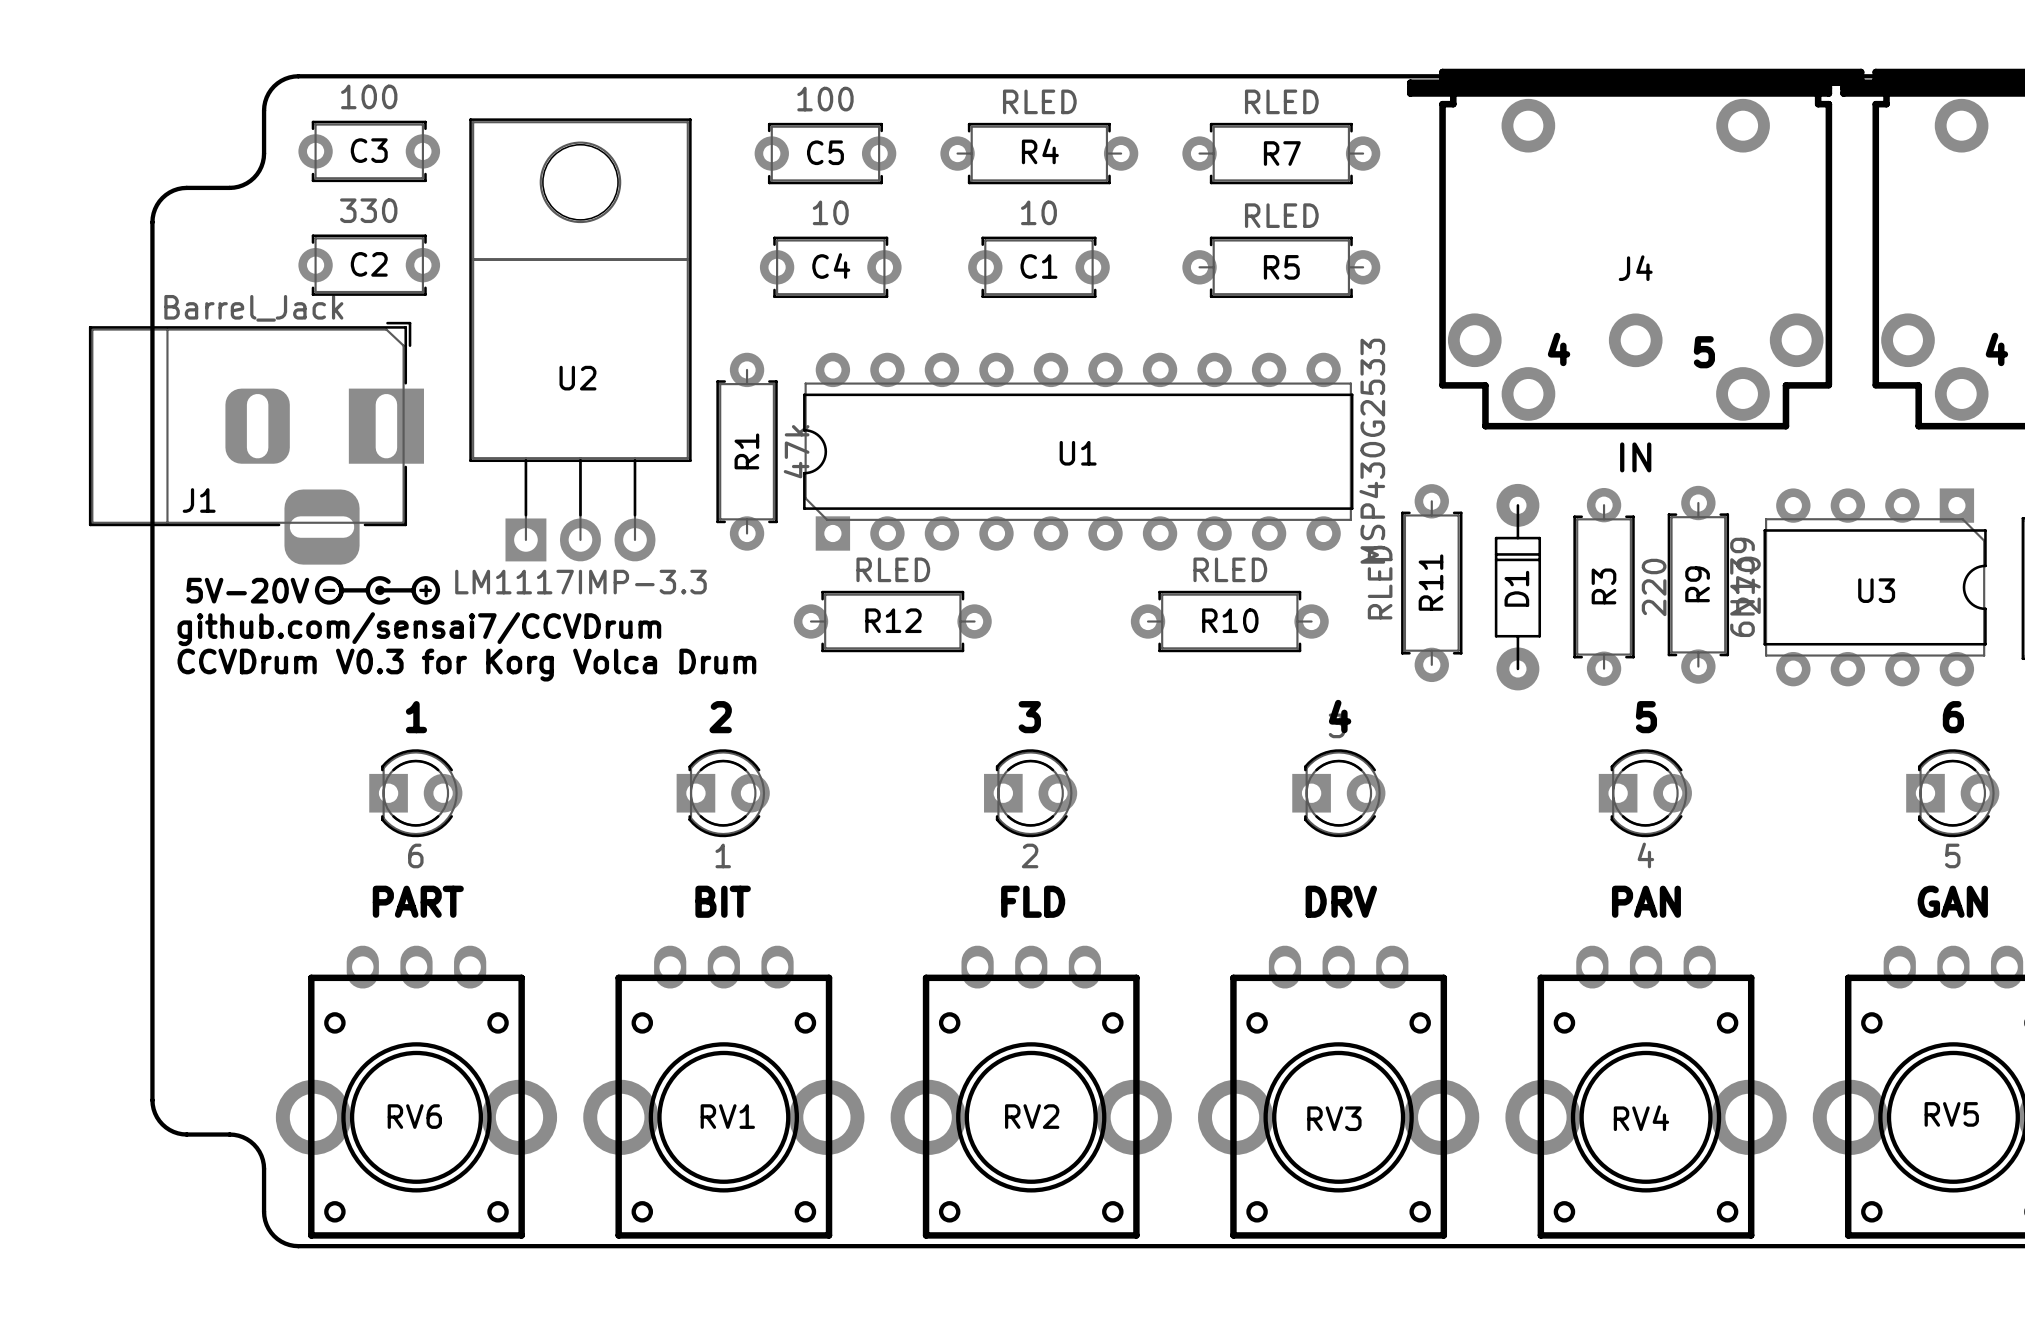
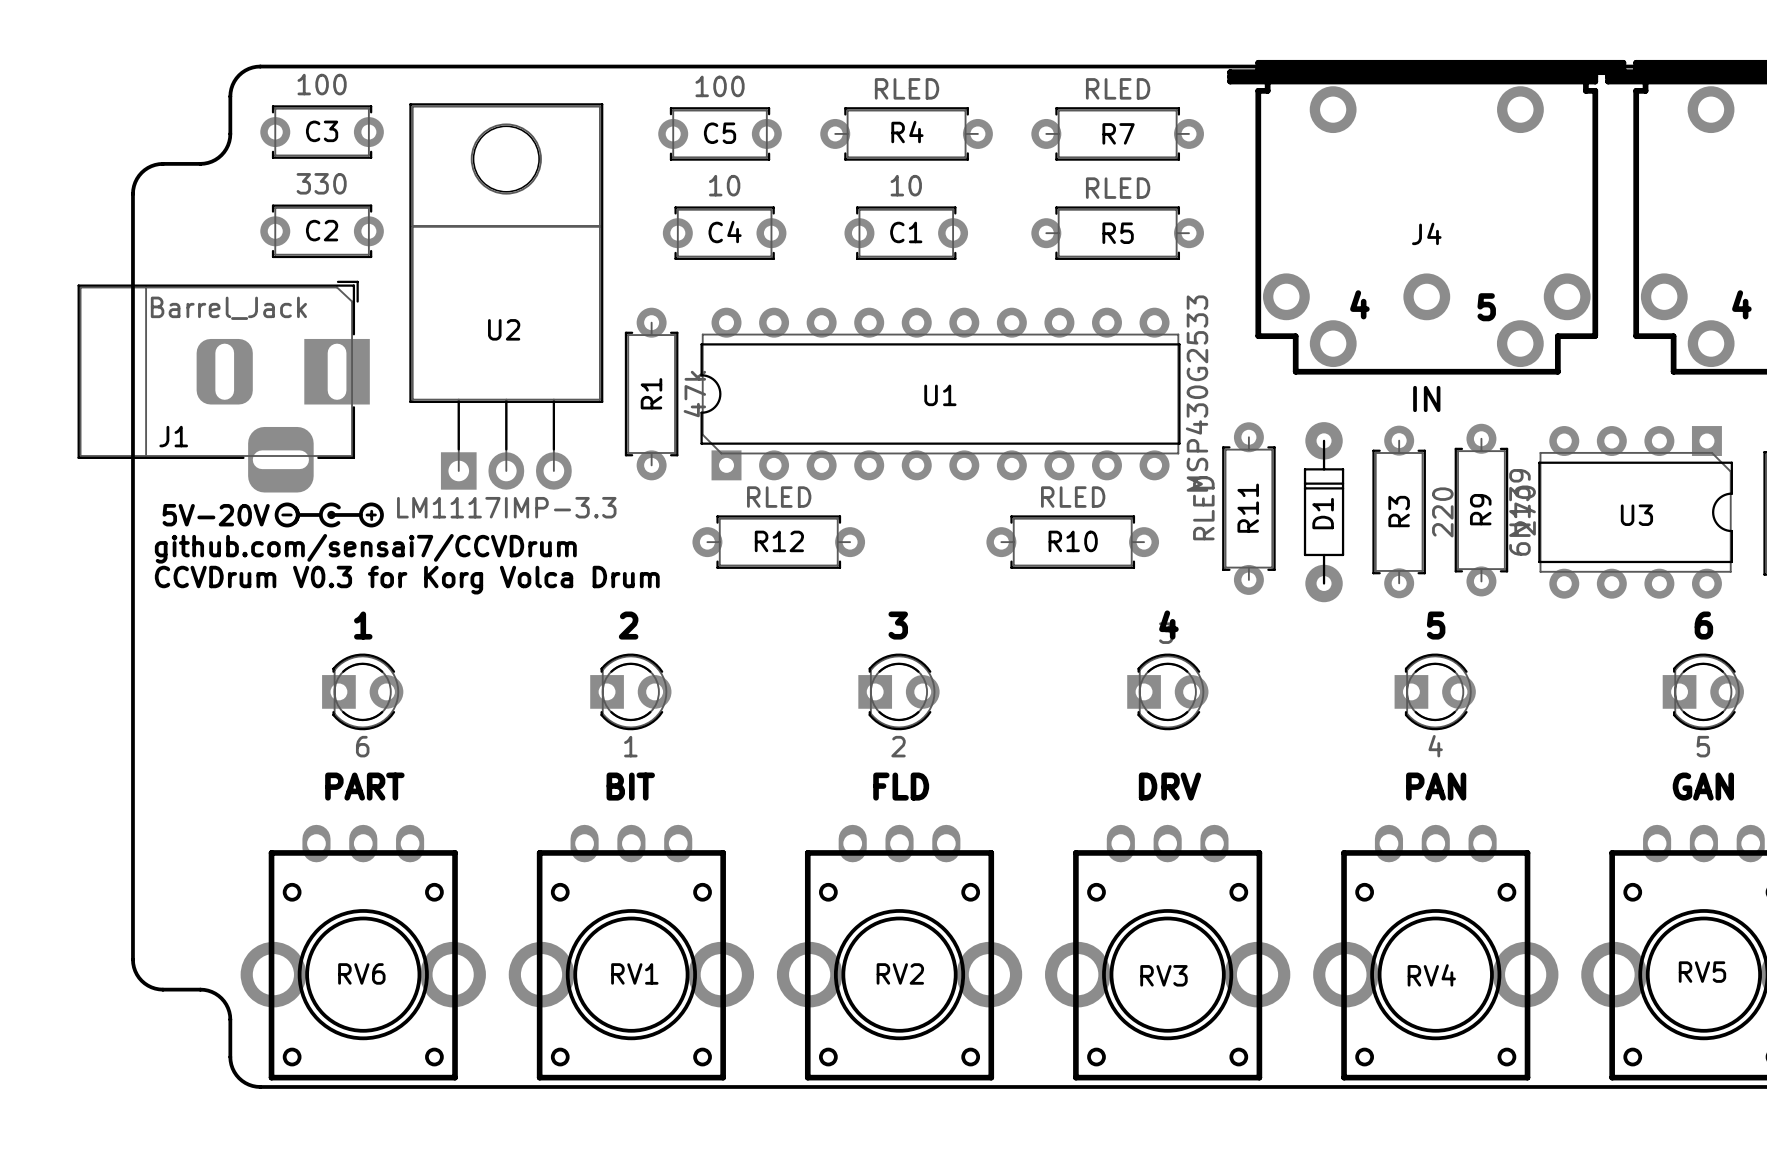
J1 value position: Barrel_Jack (253, 308) -> Barrel_Jack (228, 308)

